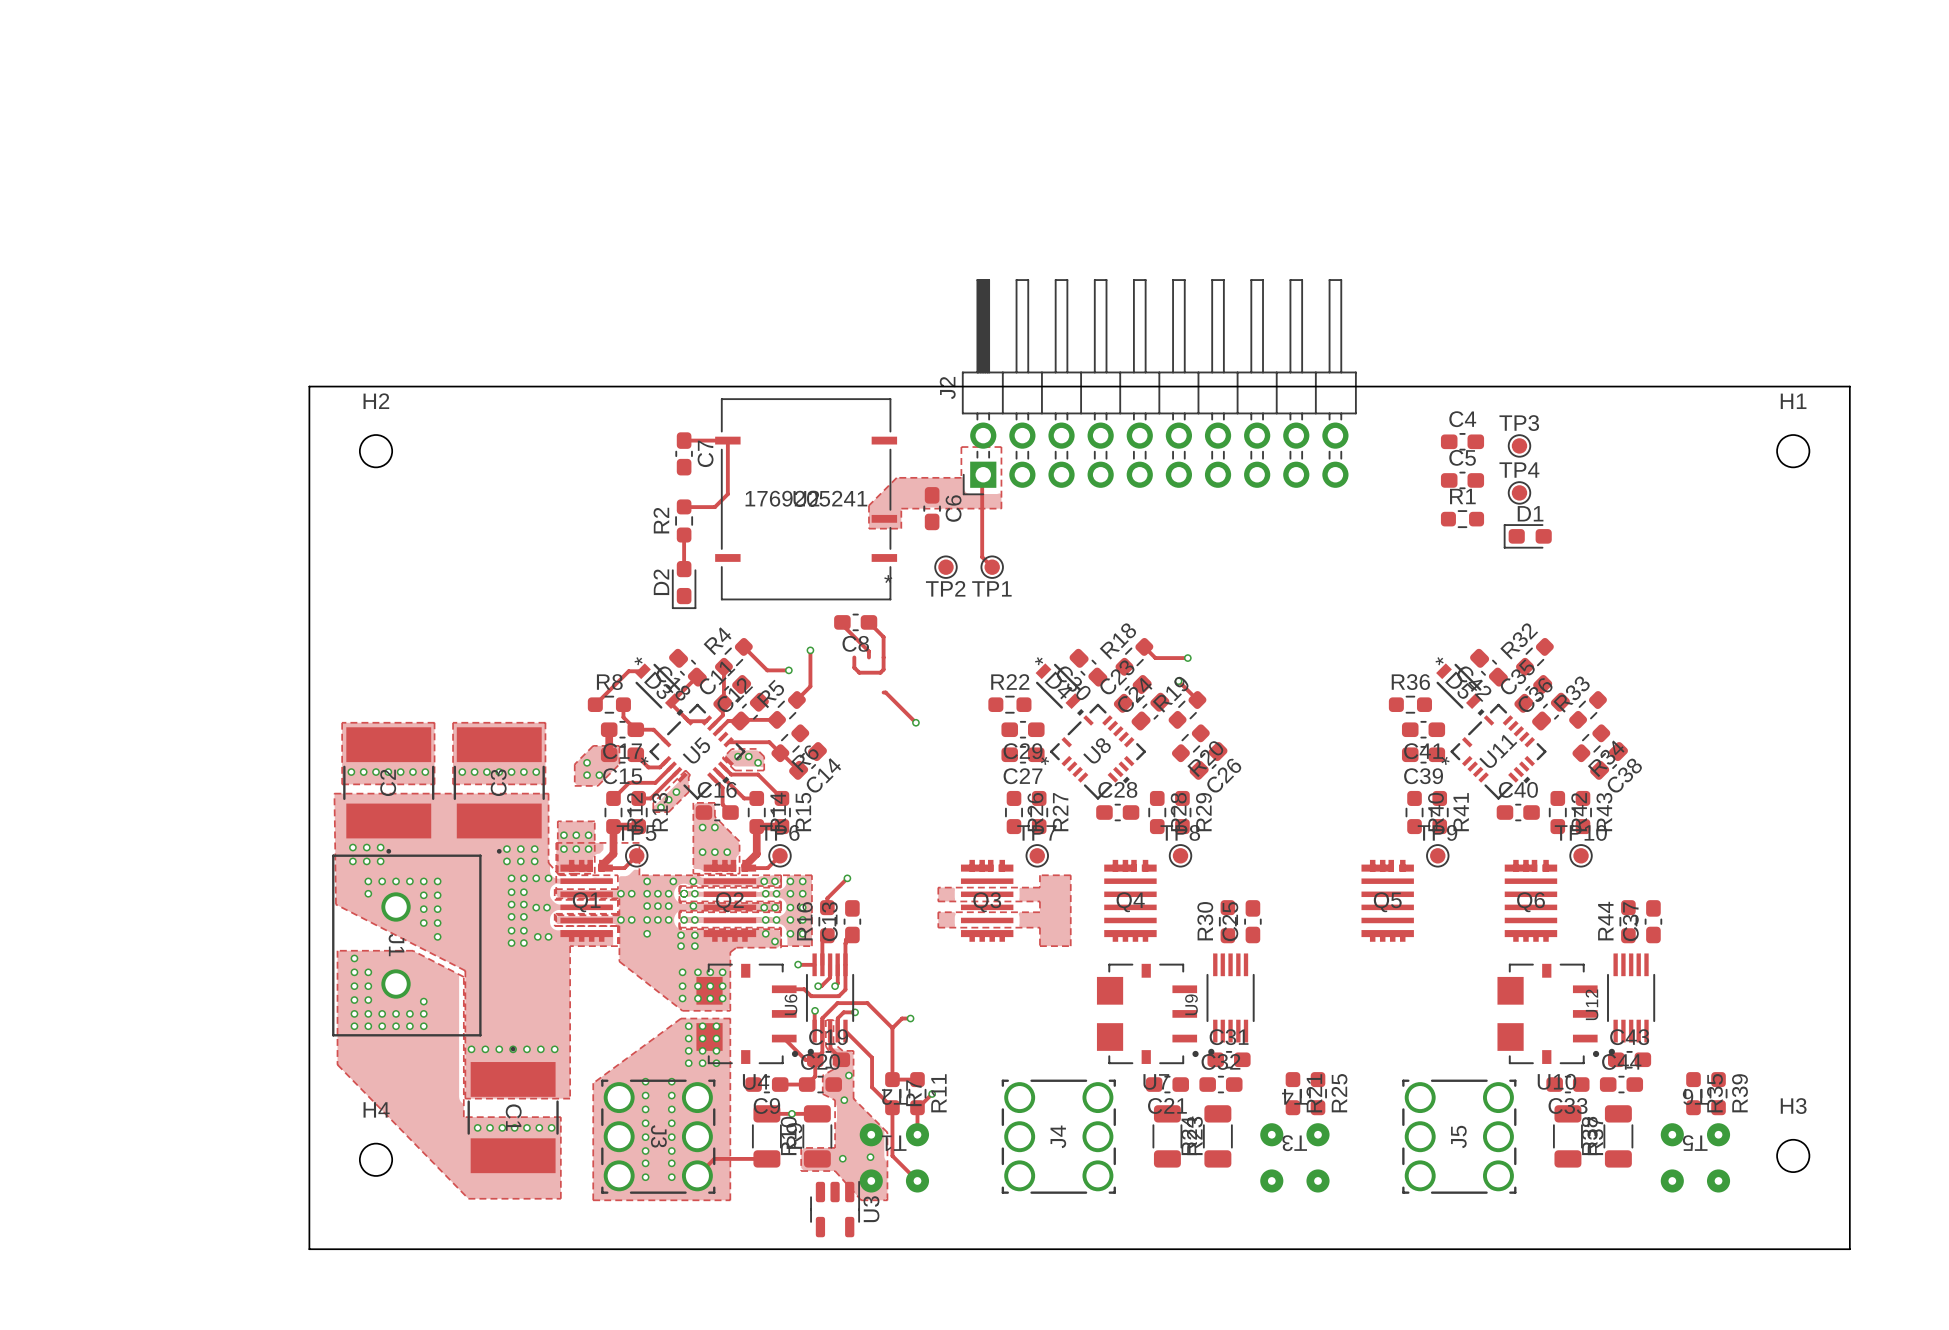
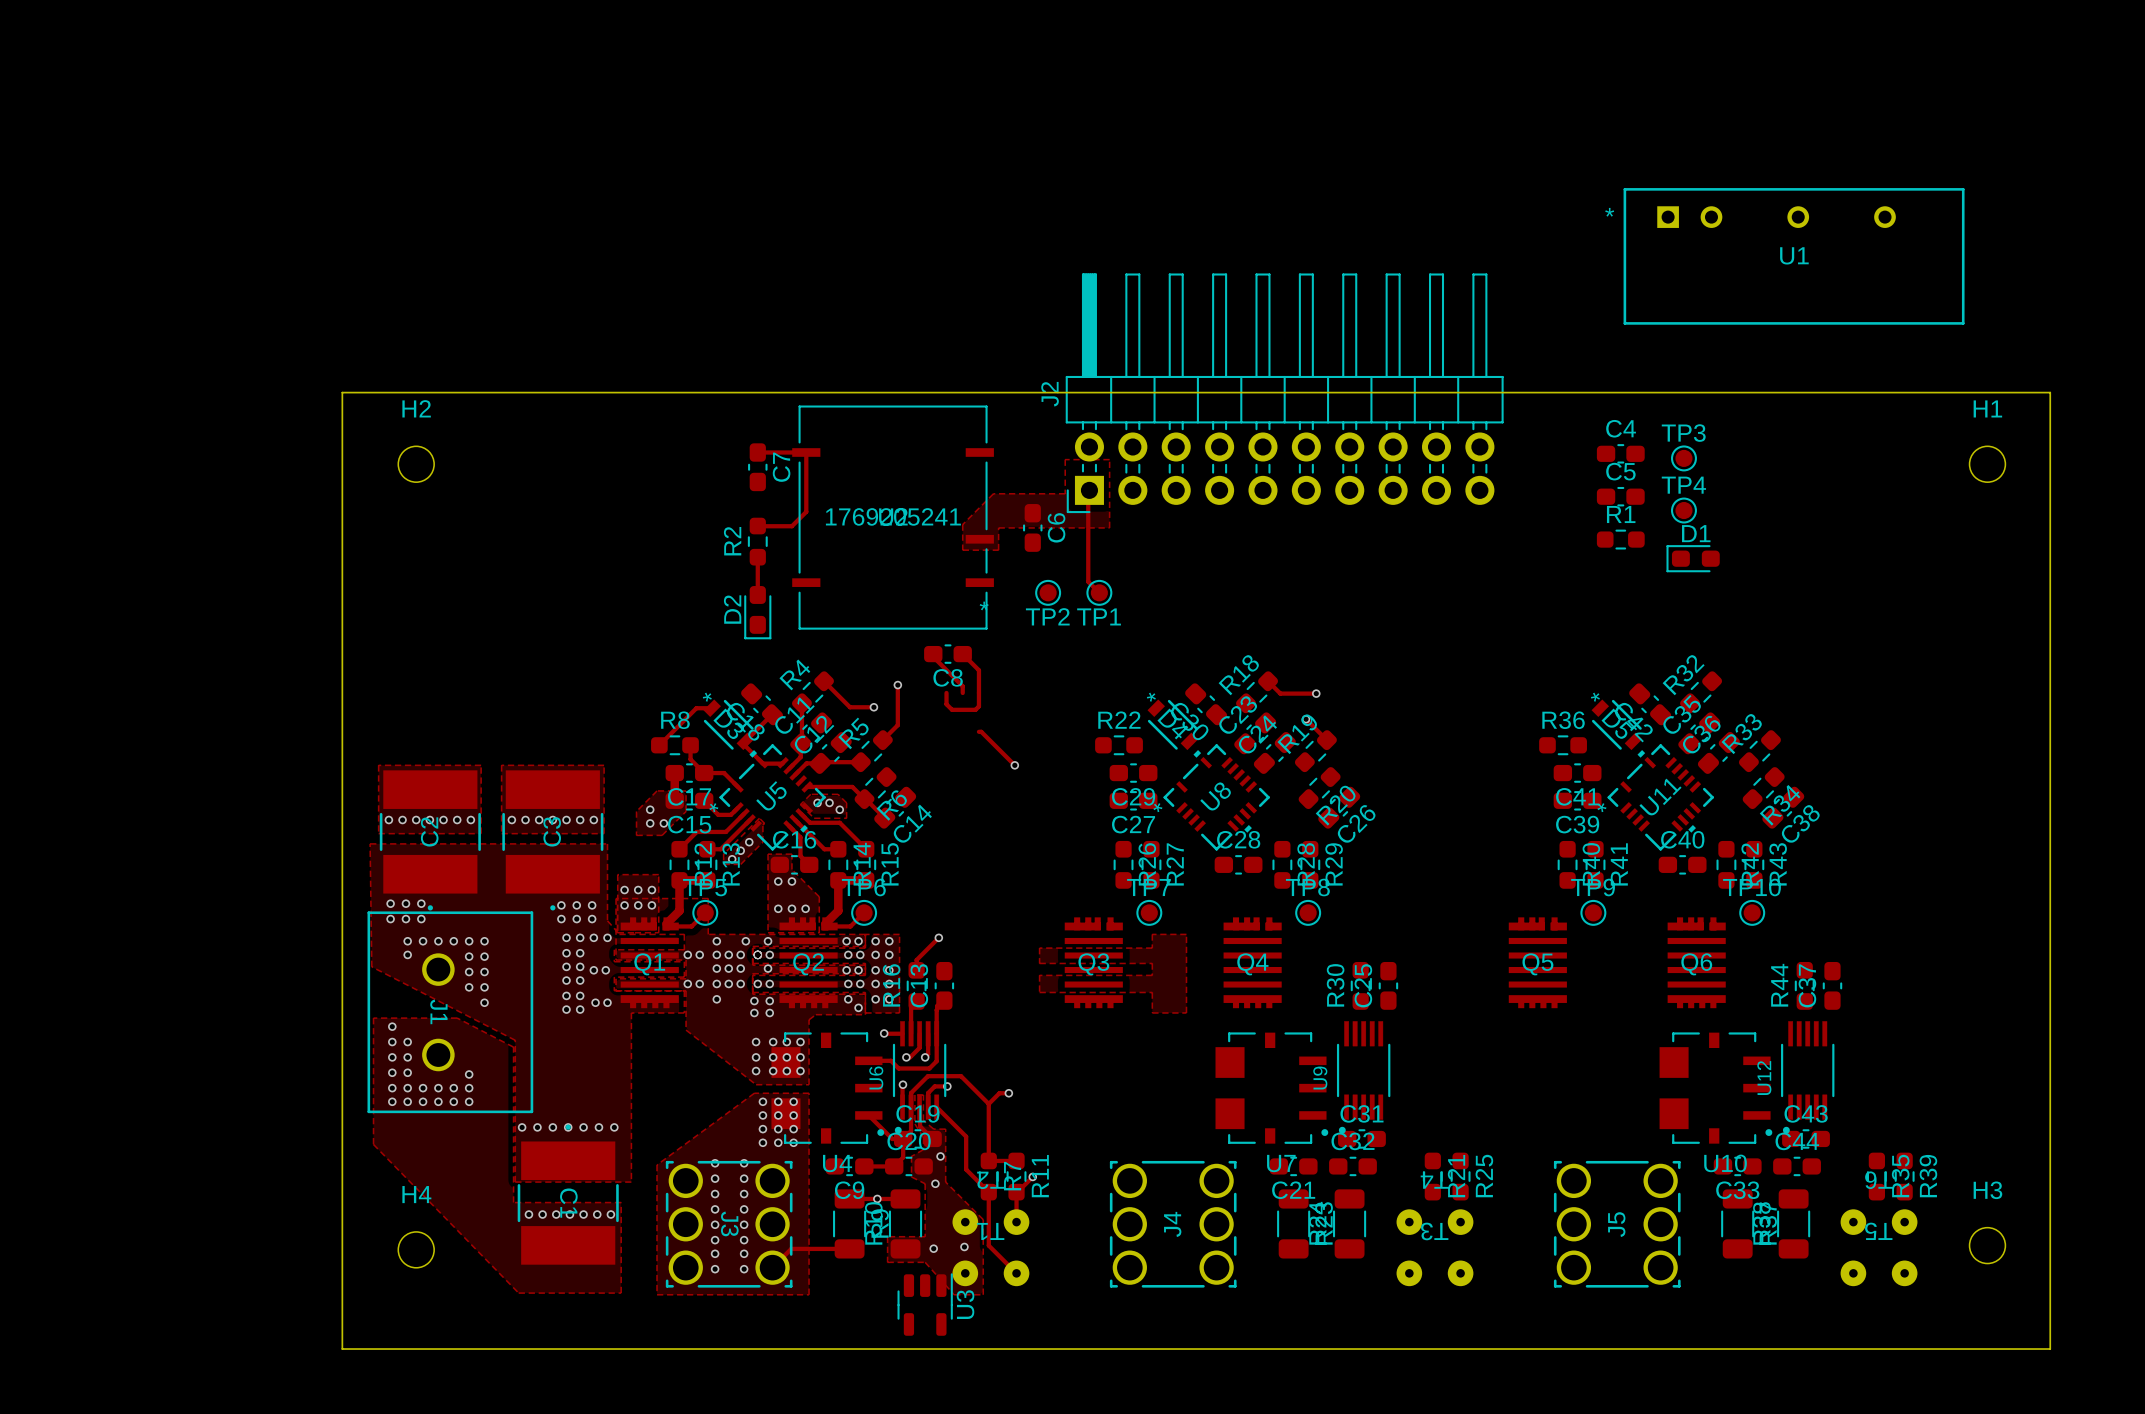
U1: none -> (1794, 256)

